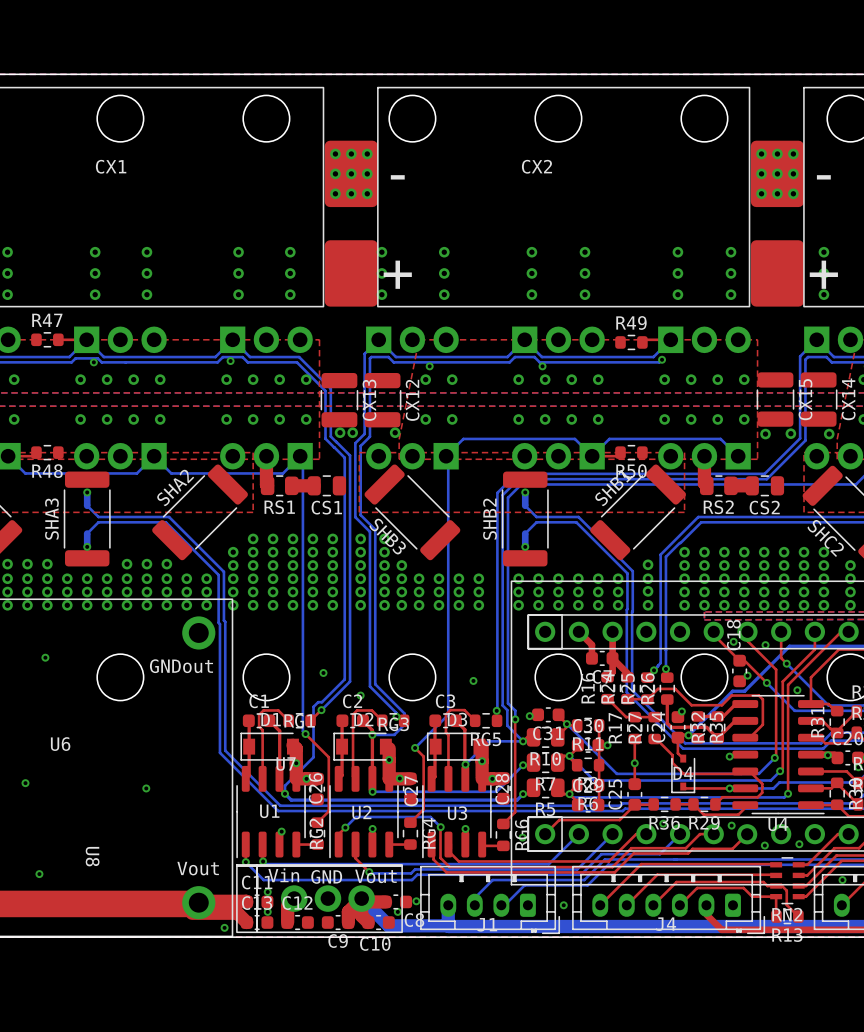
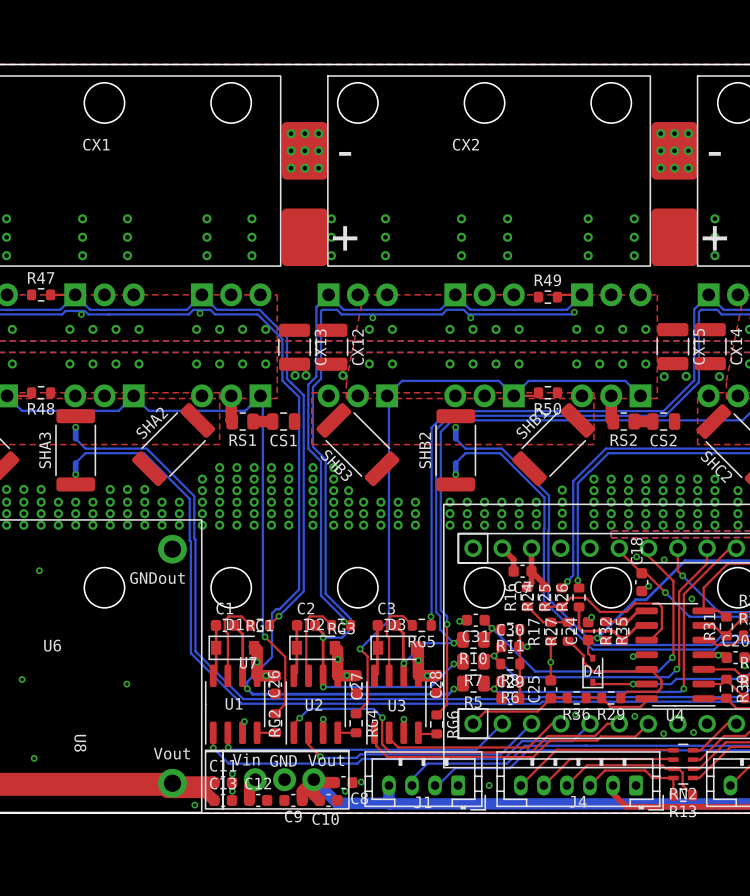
via: (323, 672) -> none
via: (473, 680) -> none
via: (360, 695) -> none
via: (522, 837) -> none
via: (842, 880) -> none

